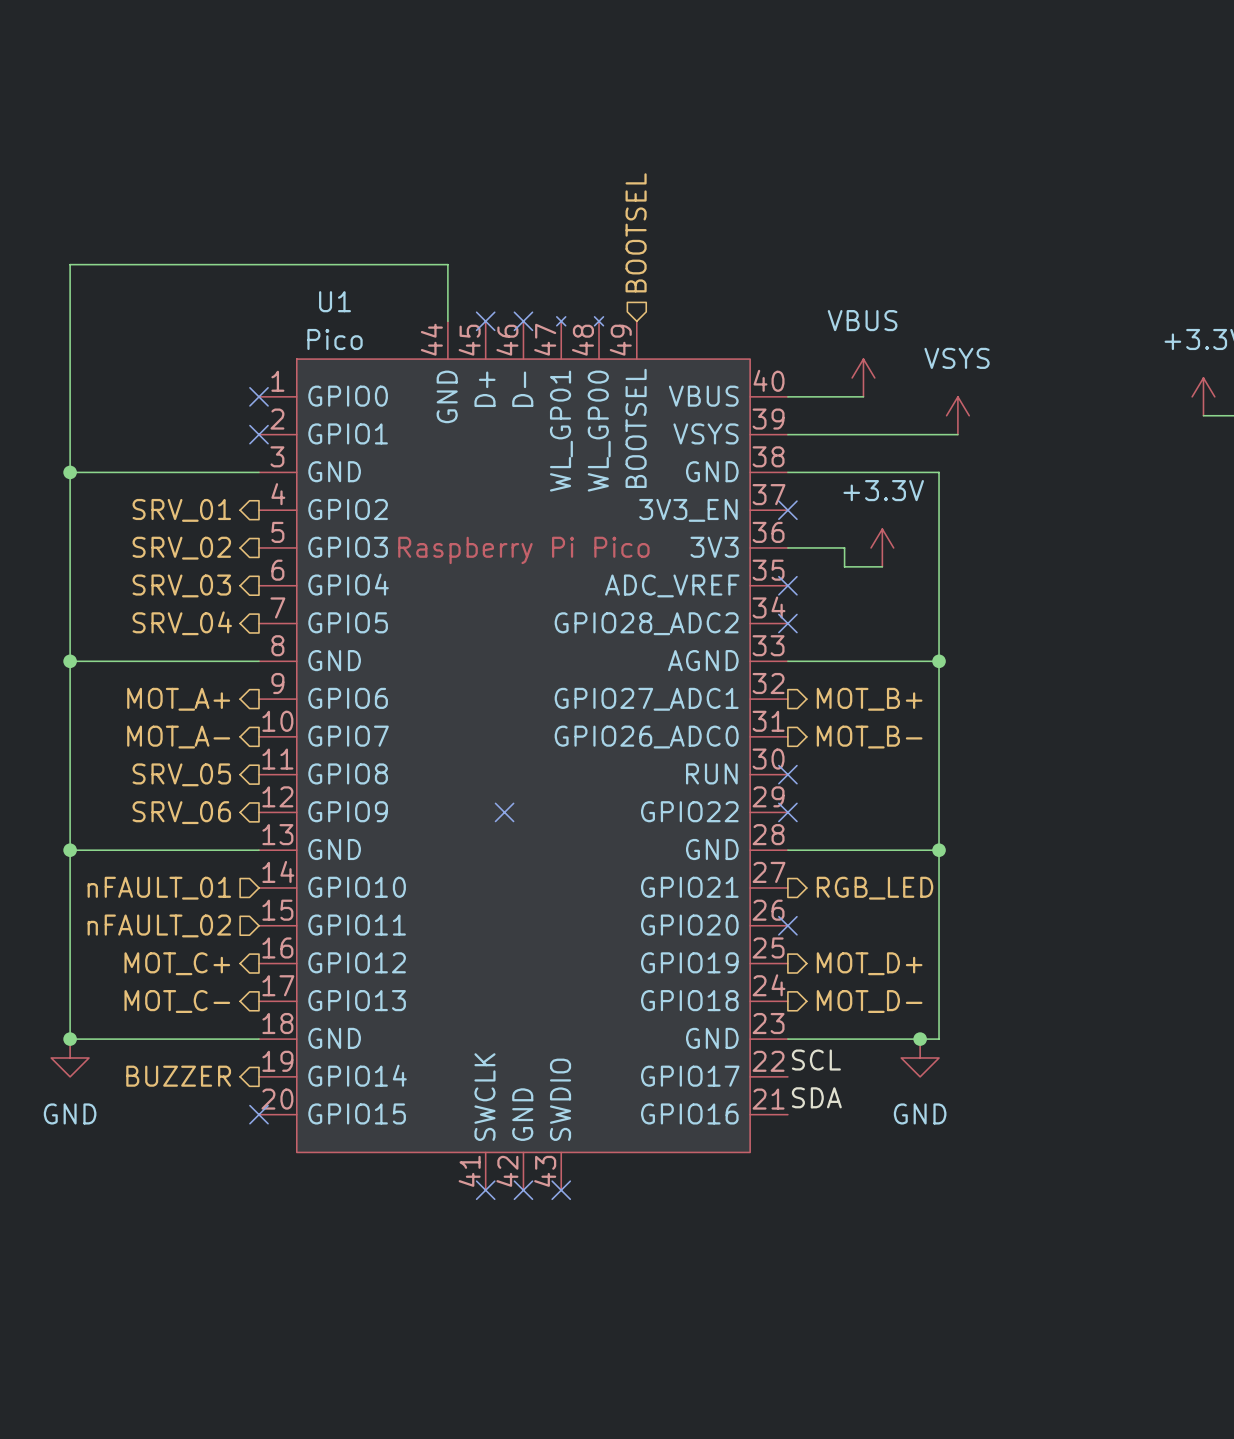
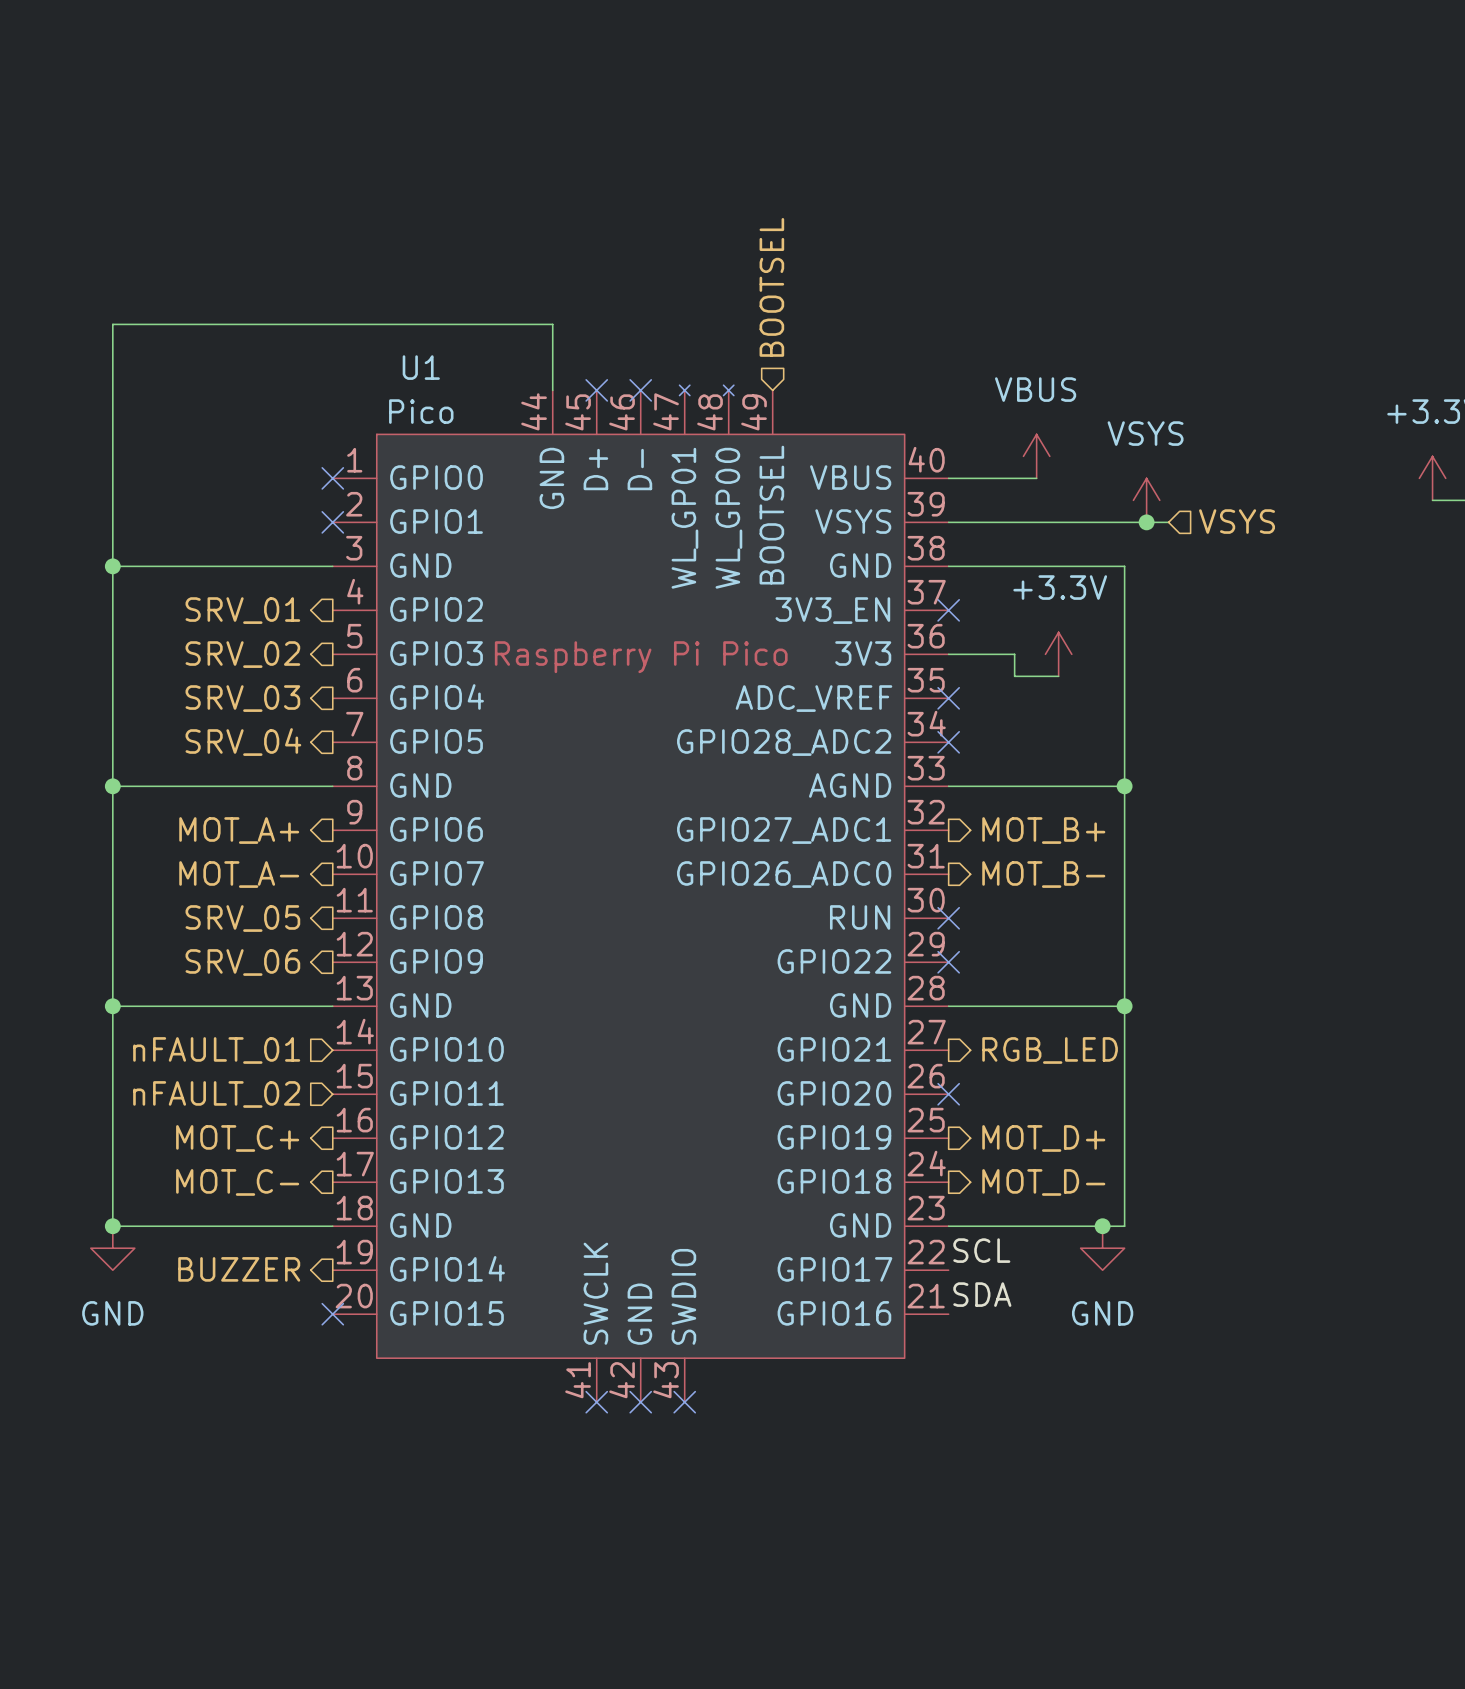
hierarchical label: none -> VSYS (1237, 521)
wire: none -> (1146, 522) (1168, 522)
junction: none -> (1146, 522)
no-connect mark: (504, 812) -> none

